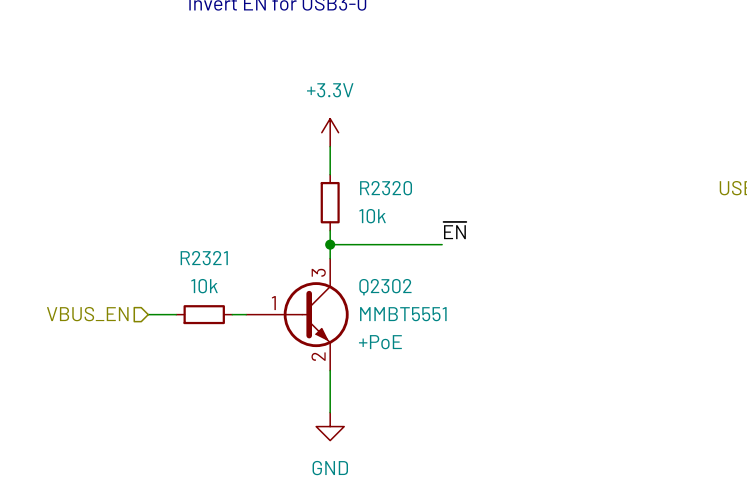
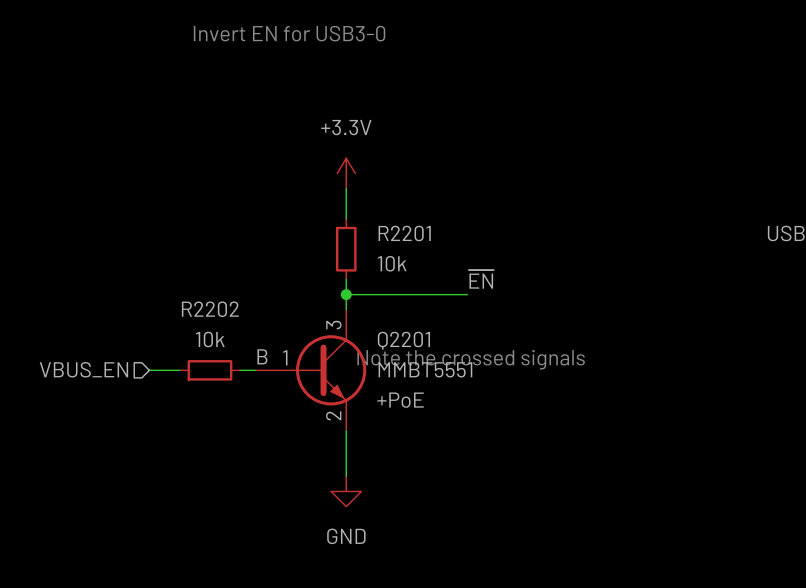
R2320 name: R2320 (386, 188) -> R2201 (404, 233)
R2321 name: R2321 (204, 258) -> R2202 (210, 309)
Q2302 name: Q2302 (385, 287) -> Q2201 (403, 340)
label: none -> B (262, 356)
text: none -> Note the crossed signals (471, 359)

